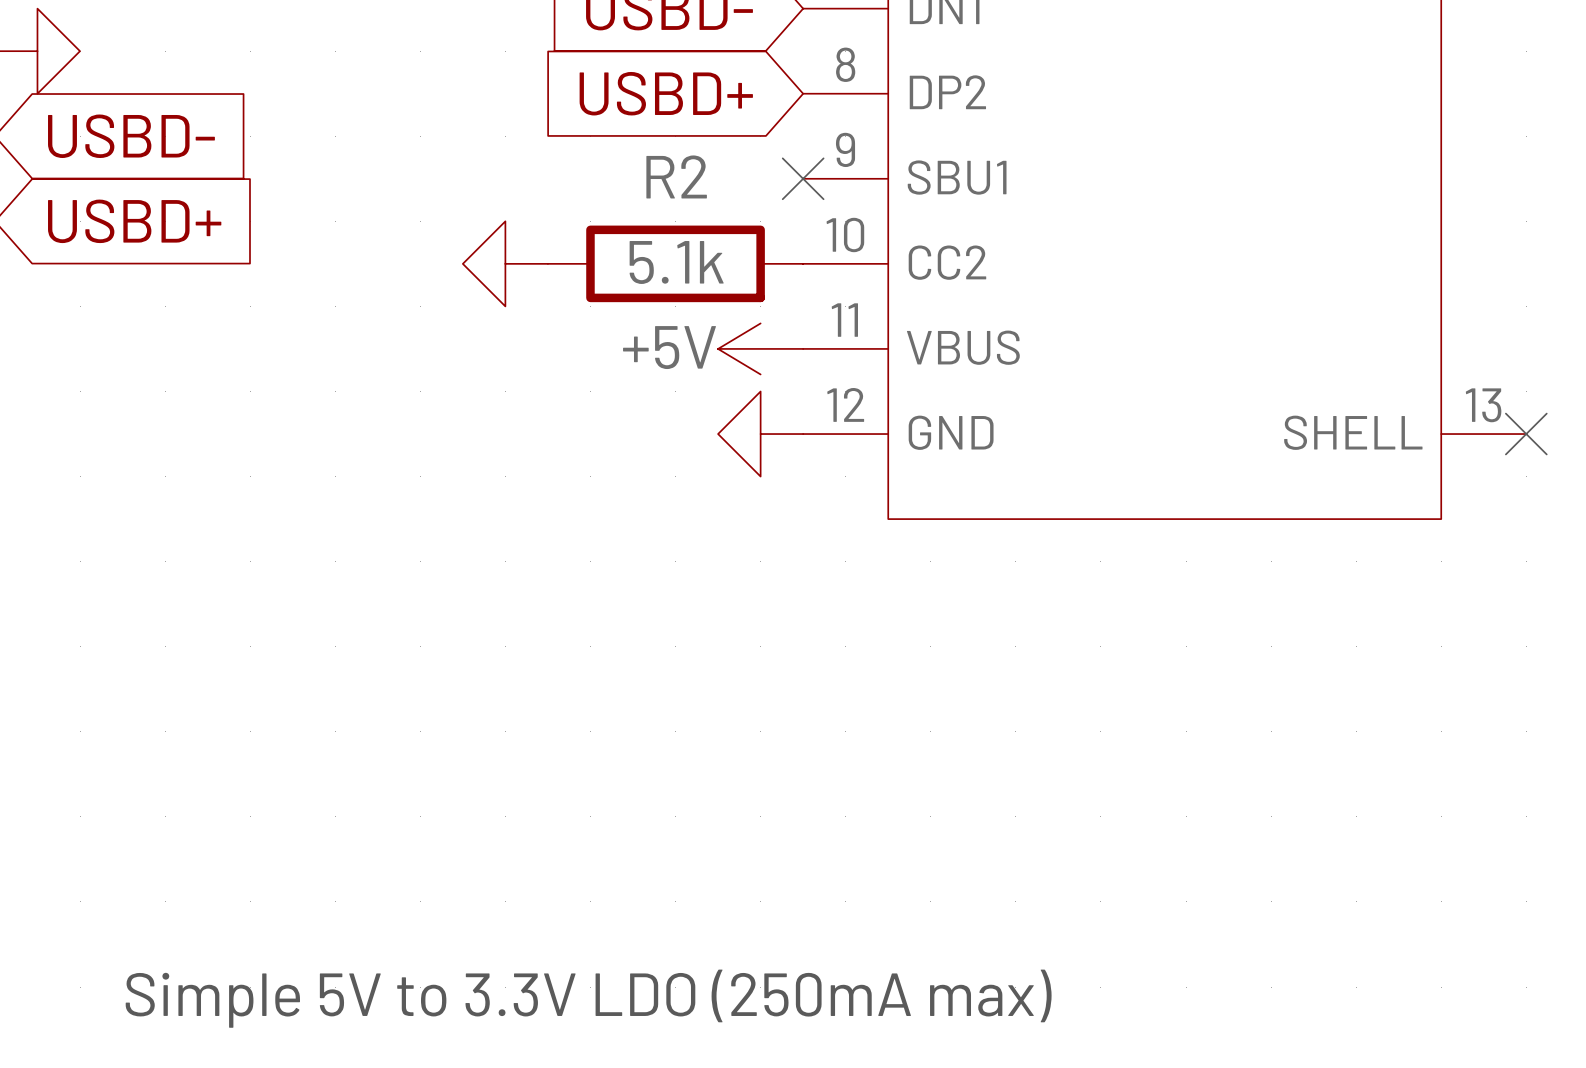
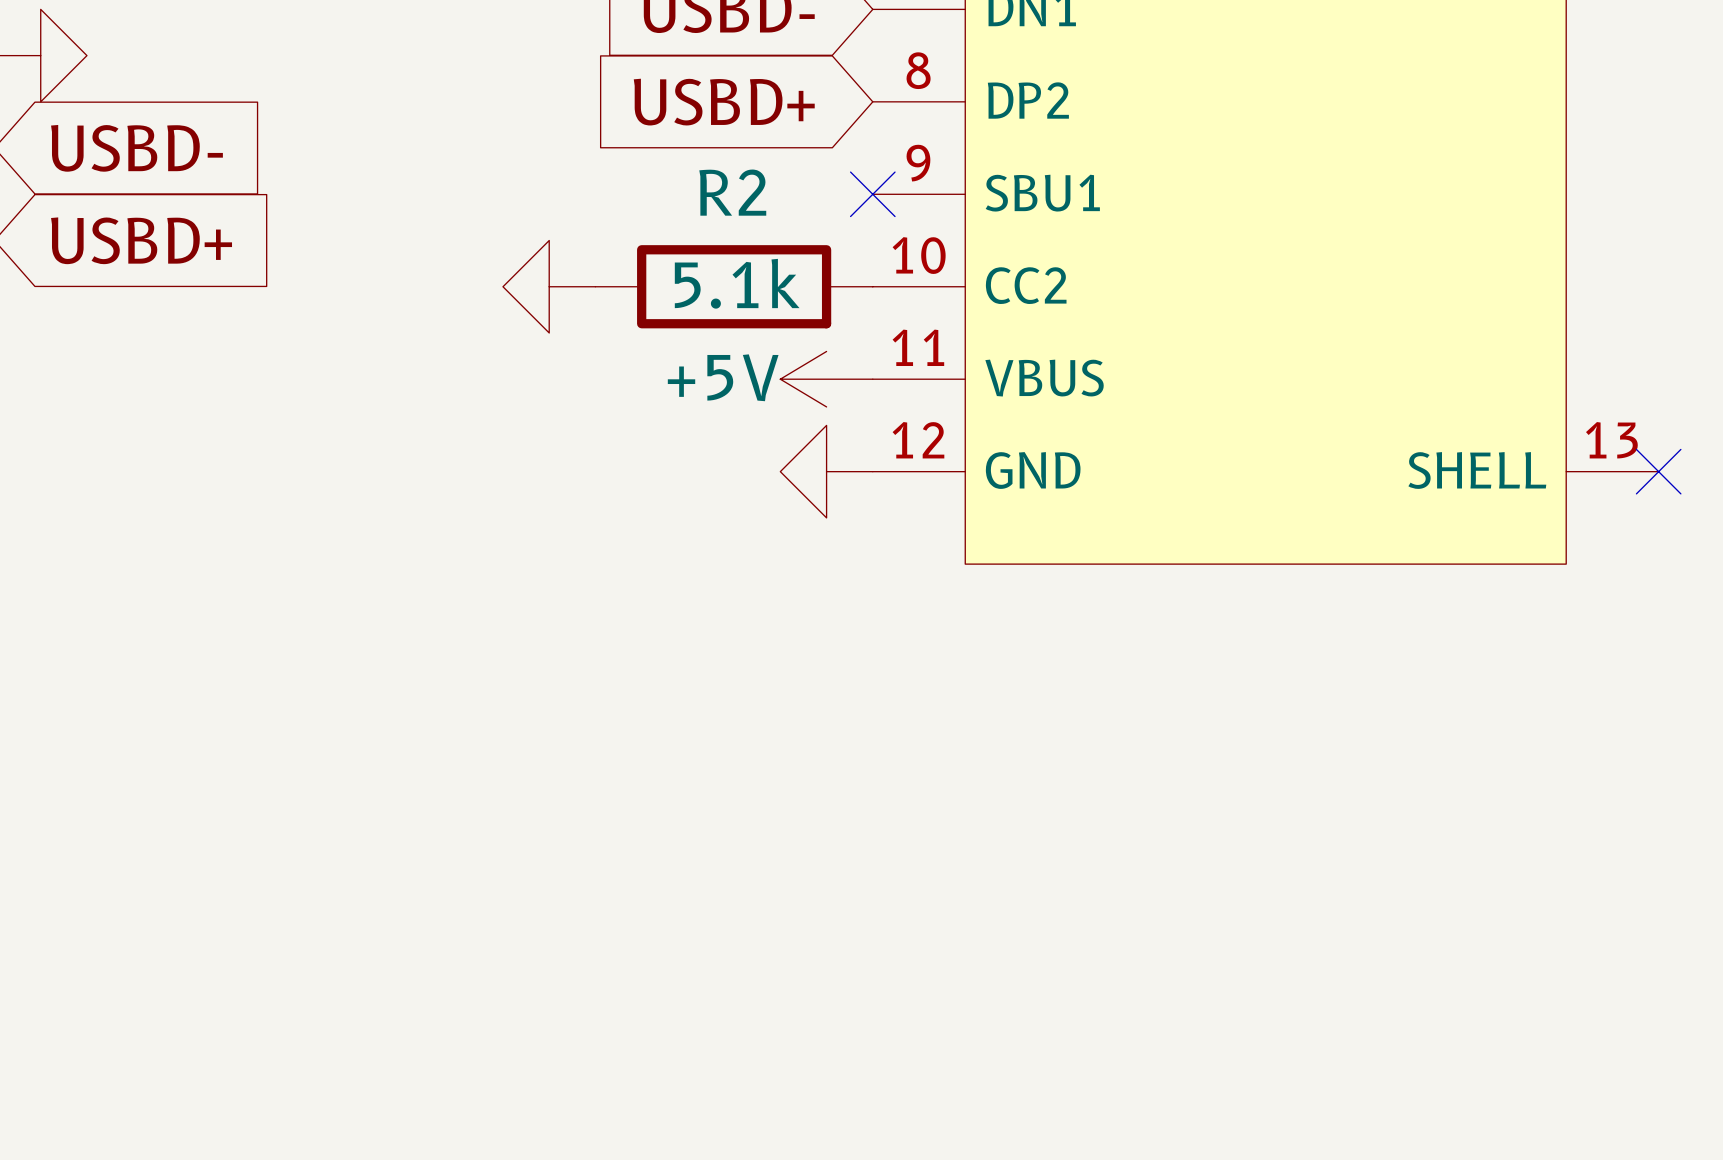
text: Simple 5V to 3.3V LDO (250mA max) (588, 998) -> none

